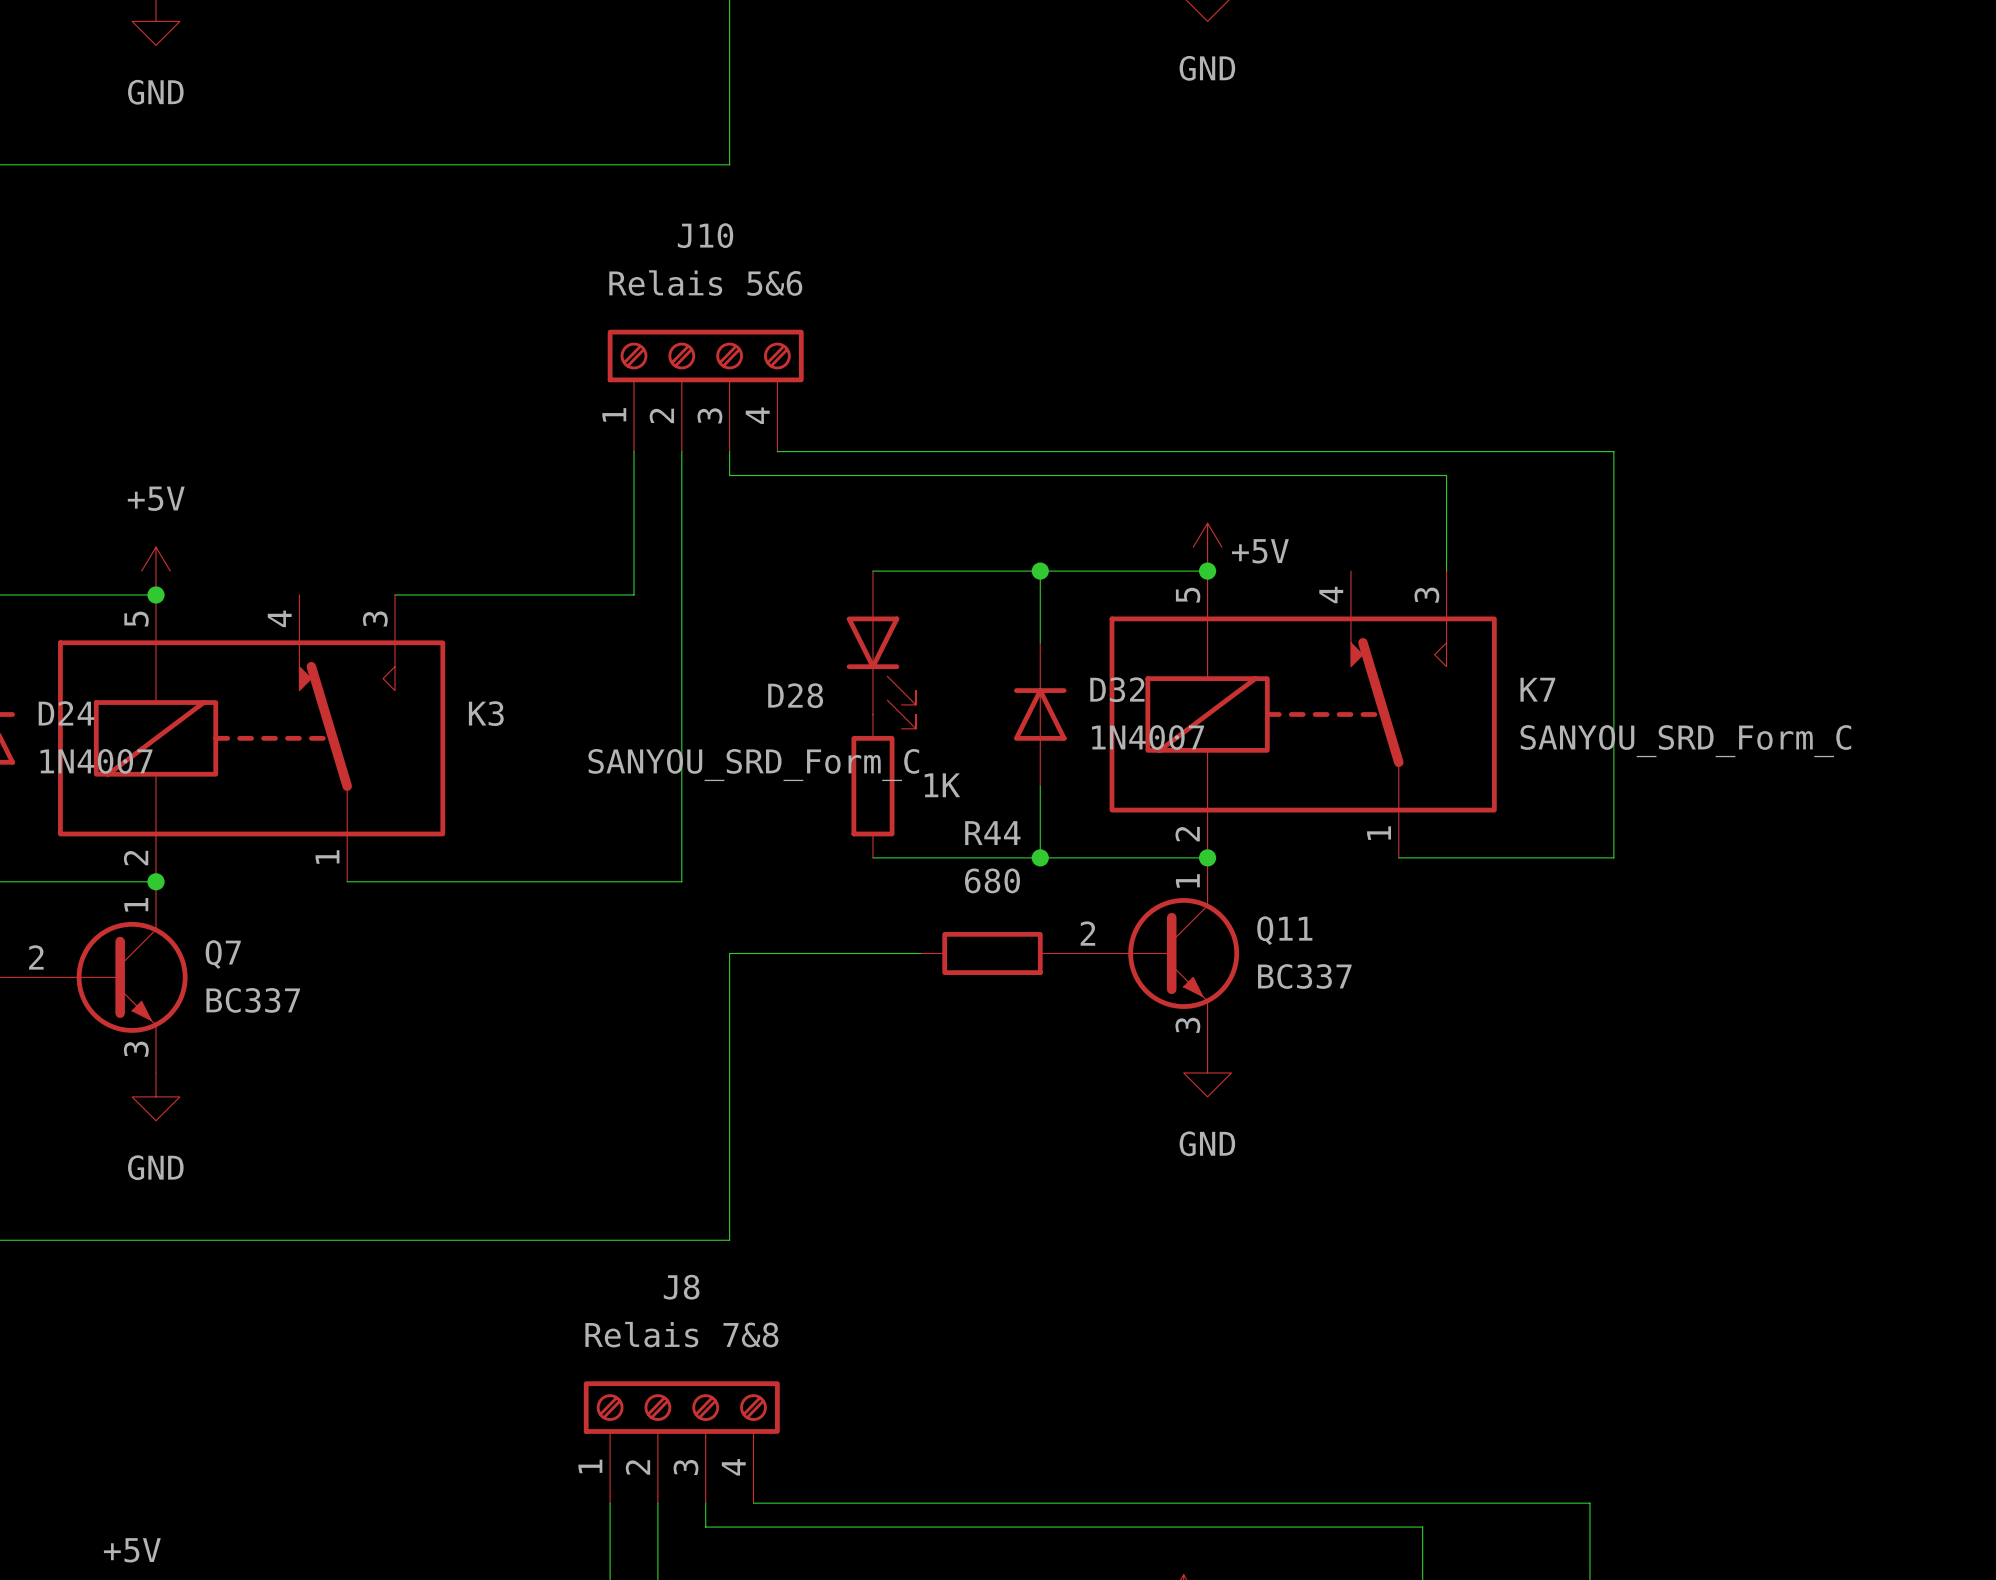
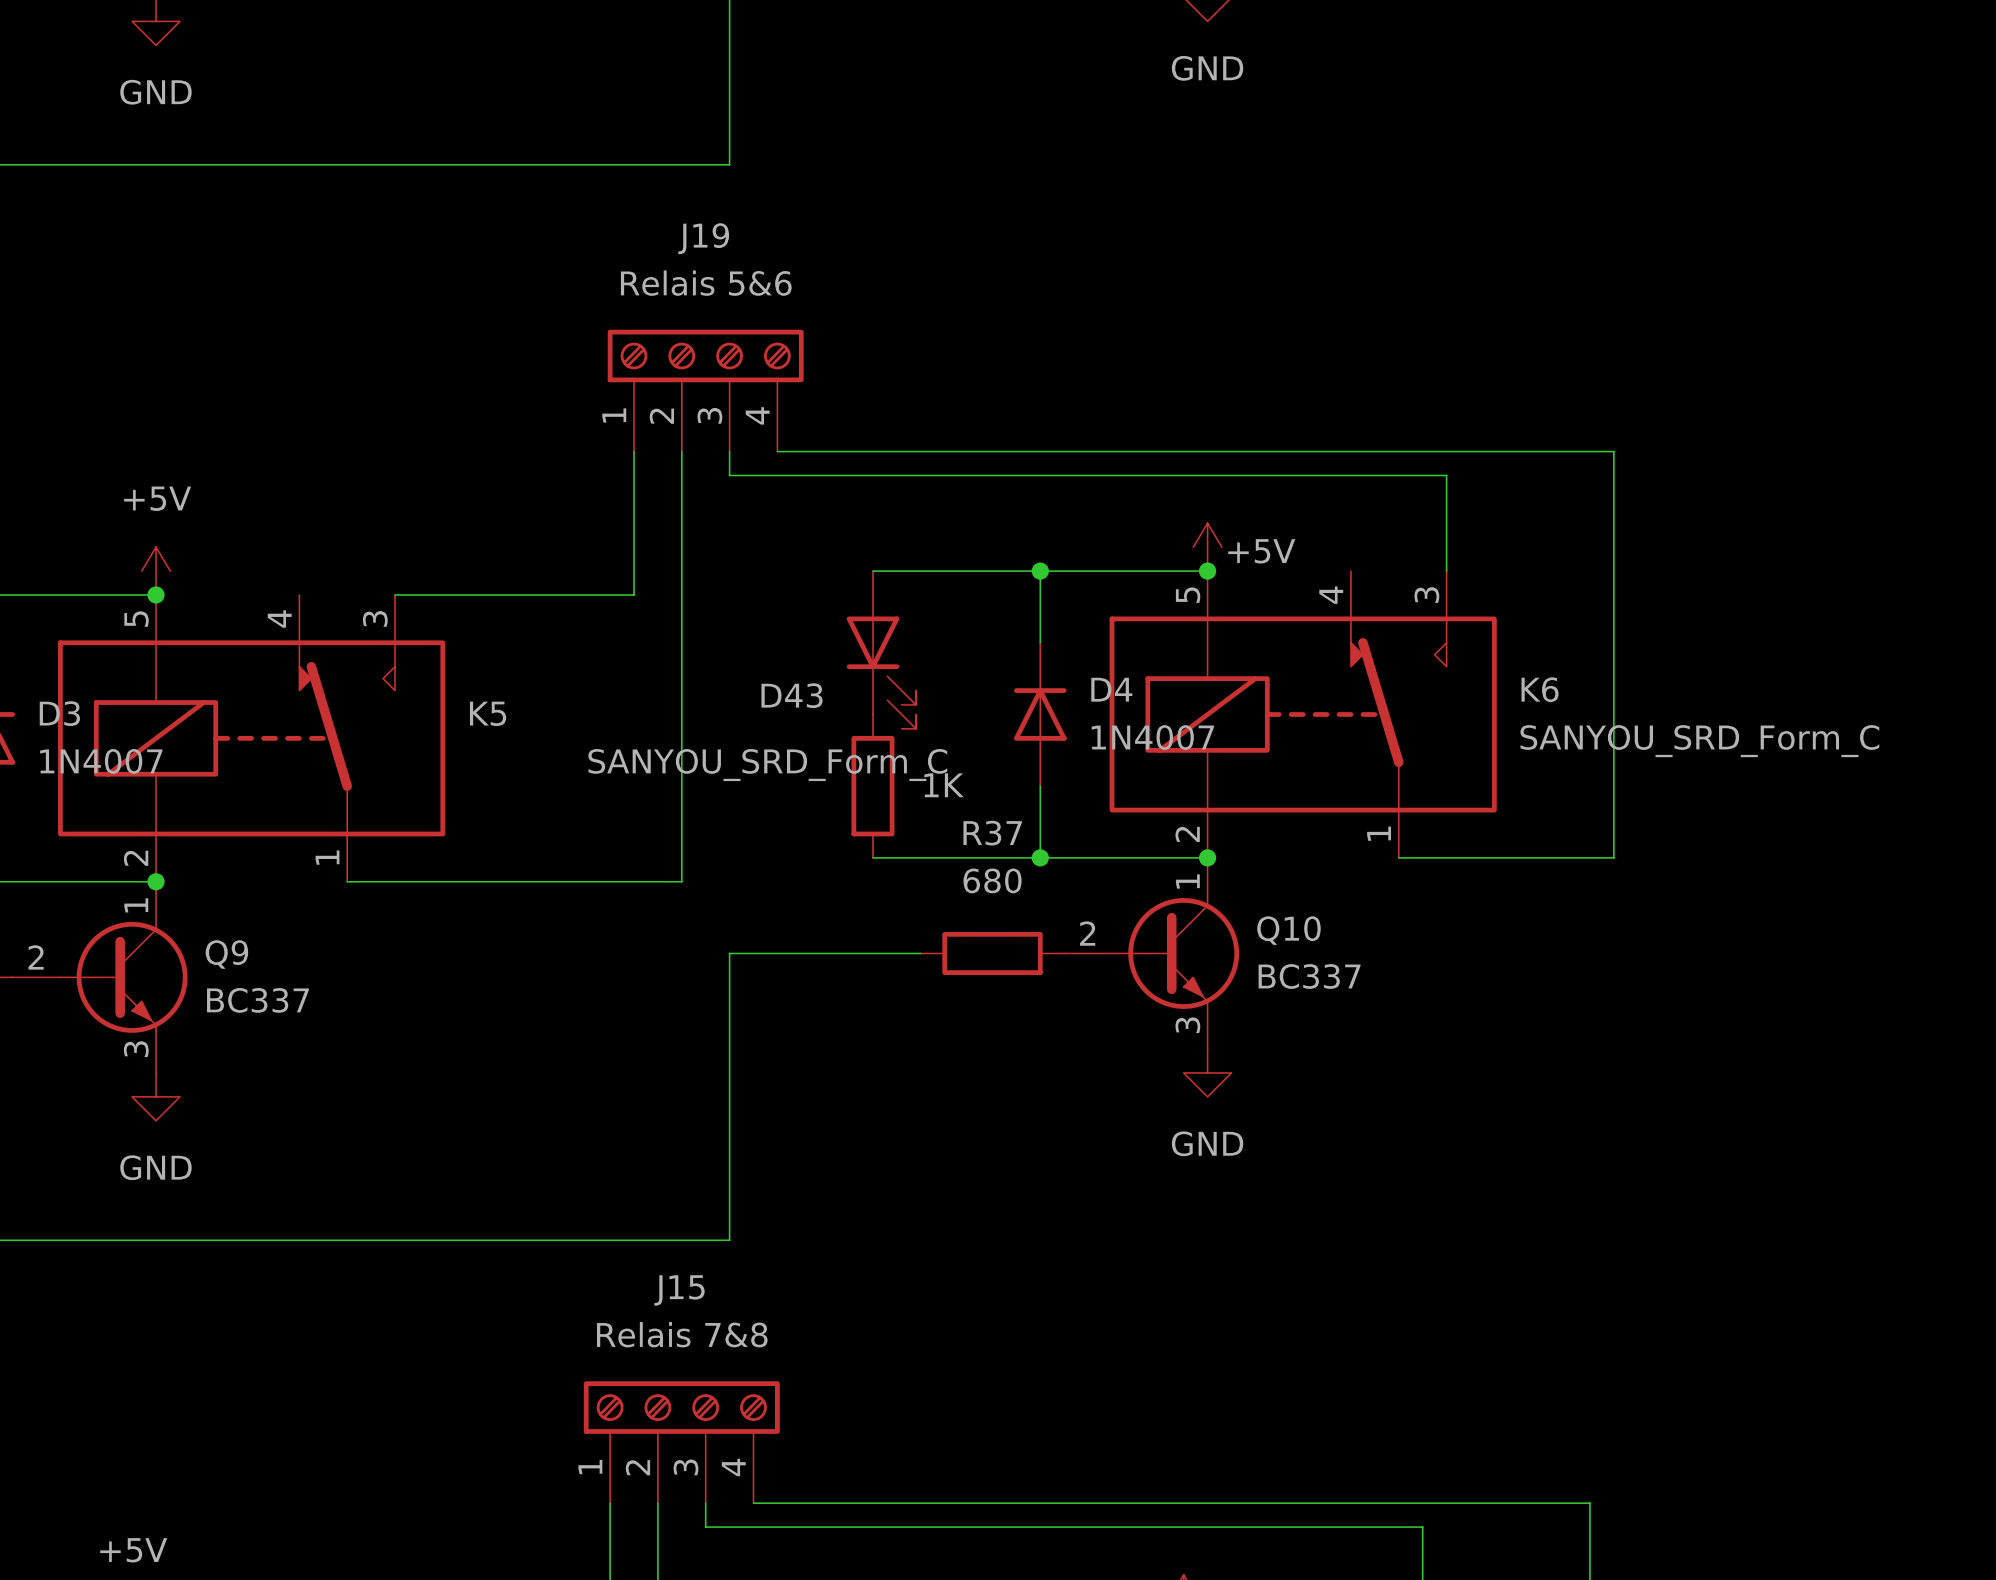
J10 name: J10 (705, 235) -> J19 (703, 238)
D32 name: D32 (1117, 689) -> D4 (1111, 689)
K7 name: K7 (1537, 689) -> K6 (1540, 689)
D28 name: D28 (795, 695) -> D43 (792, 695)
D24 name: D24 (66, 713) -> D3 (59, 713)
K3 name: K3 (486, 713) -> K5 (488, 713)
R44 name: R44 (992, 833) -> R37 (992, 833)
Q11 name: Q11 (1284, 930) -> Q10 (1288, 930)
Q7 name: Q7 (223, 954) -> Q9 (226, 954)
J8 name: J8 (681, 1287) -> J15 (679, 1290)

